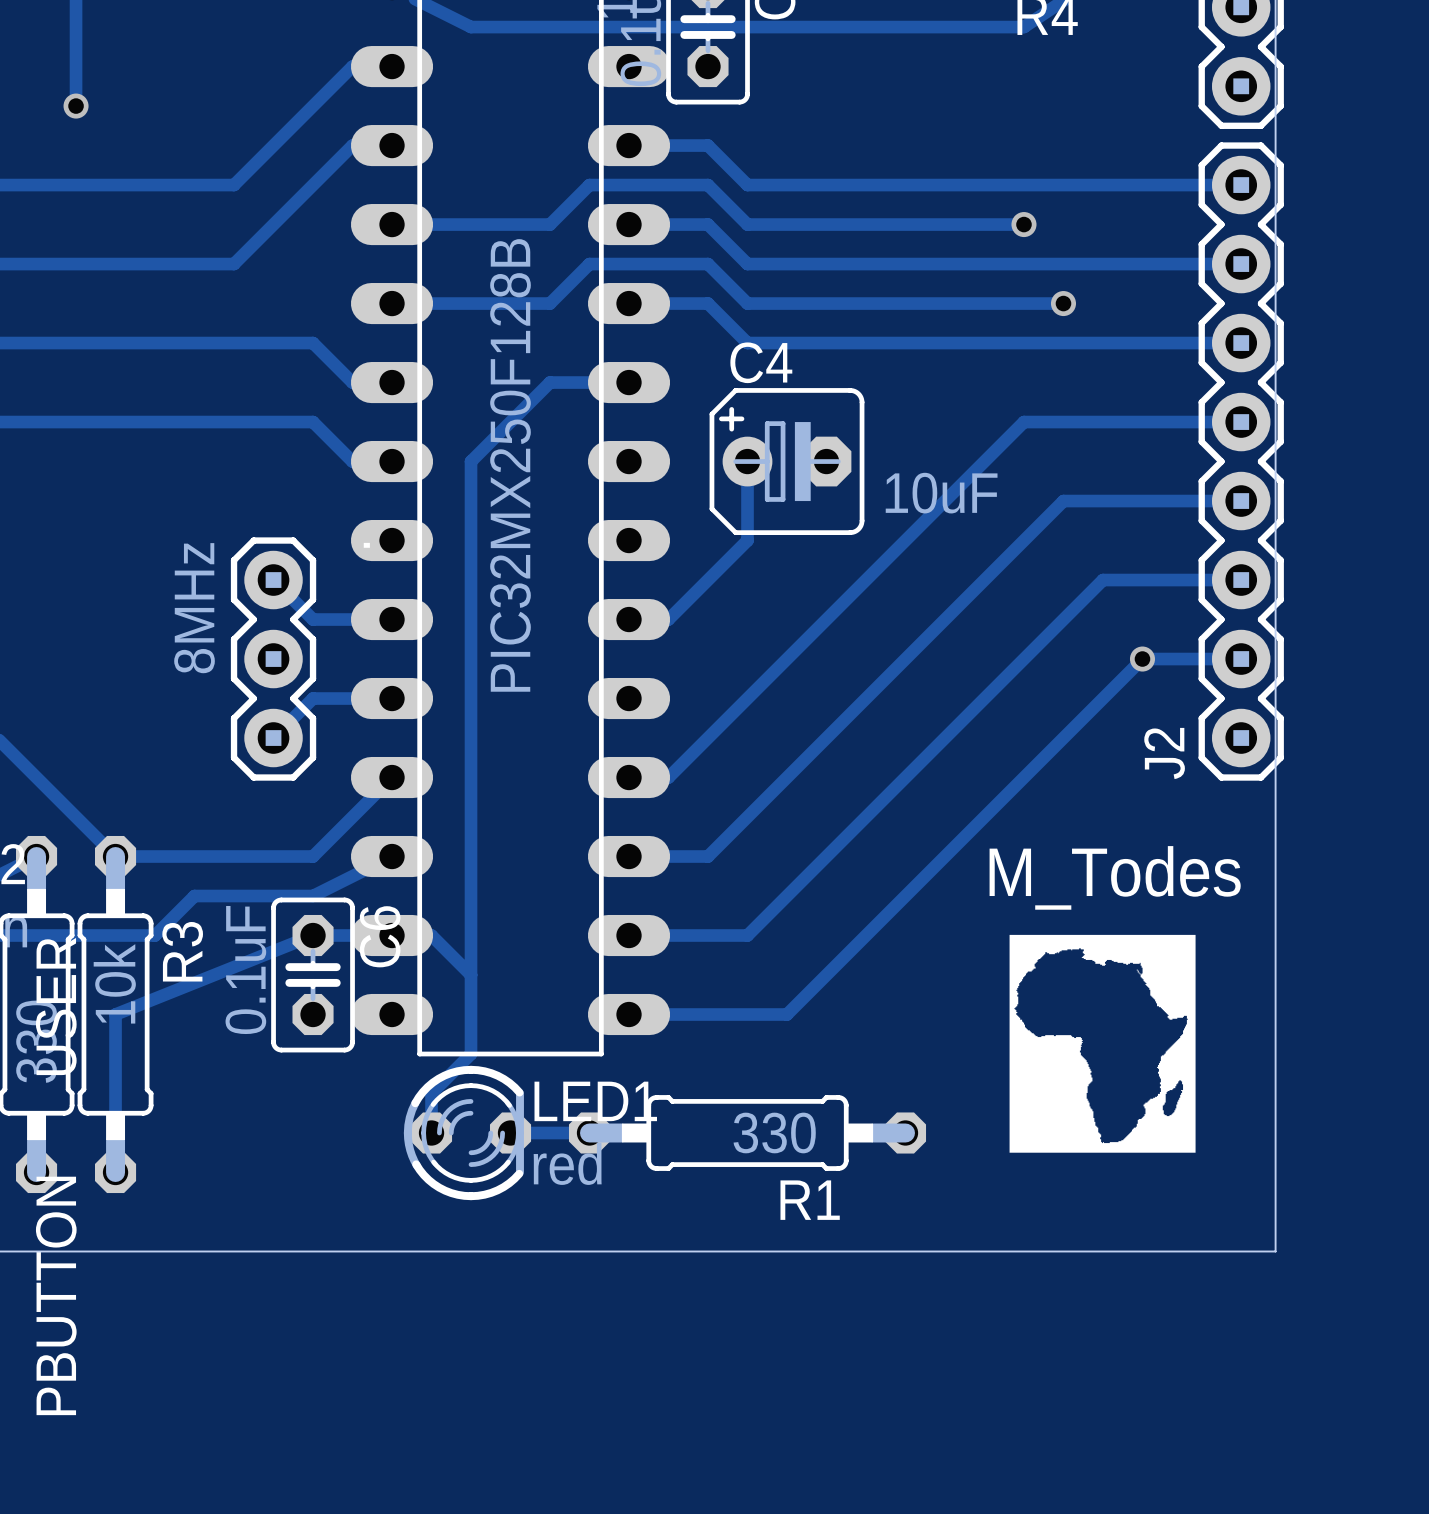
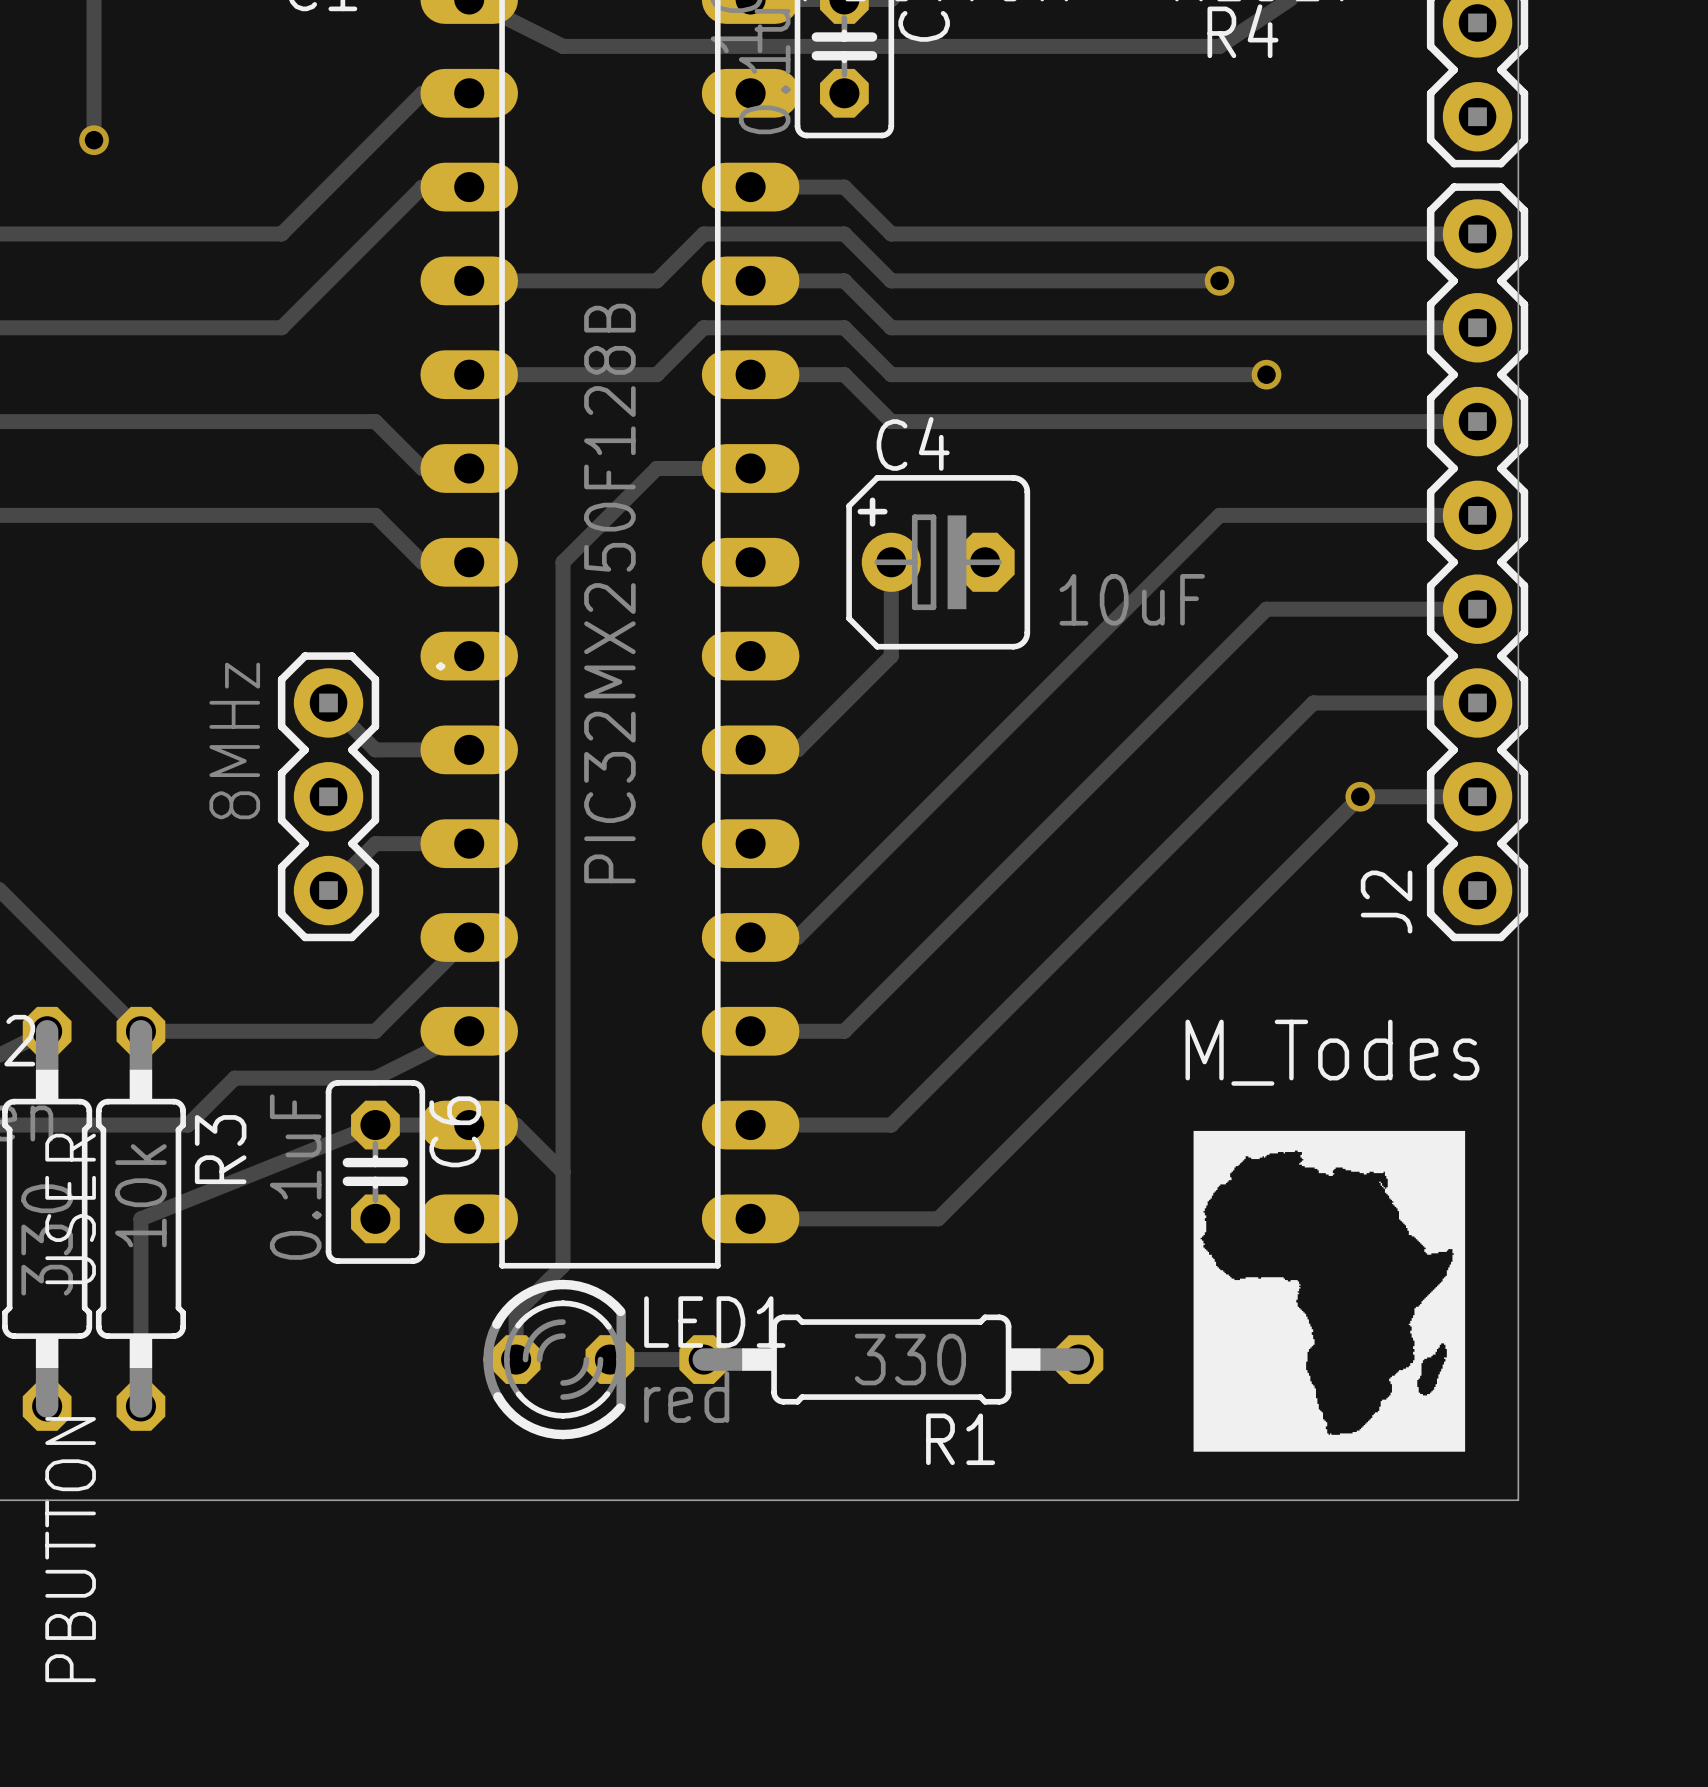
drawing: [1009, 934, 1196, 1153] -> none
drawing: none -> [1193, 1130, 1466, 1452]
drawing position: (1099, 960) -> (1325, 1169)
drawing position: (1103, 965) -> (1330, 1175)
drawing position: (1023, 1036) -> (1209, 1273)
drawing position: (1041, 1037) -> (1231, 1154)
drawing position: (1078, 1037) -> (1294, 1280)
drawing position: (1103, 1142) -> (1330, 1434)

